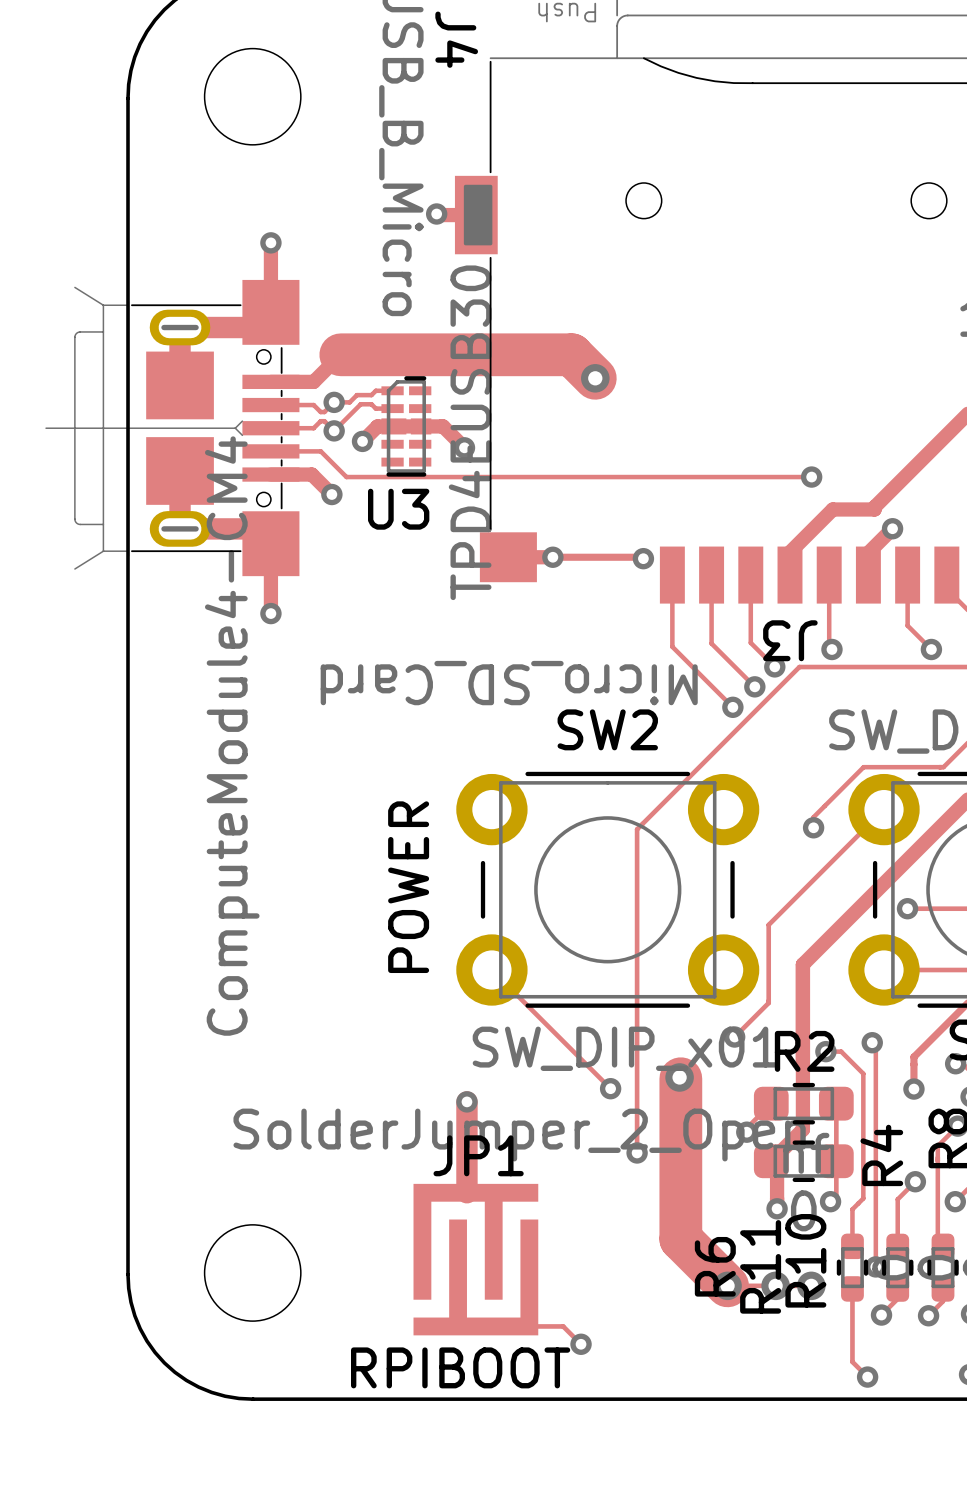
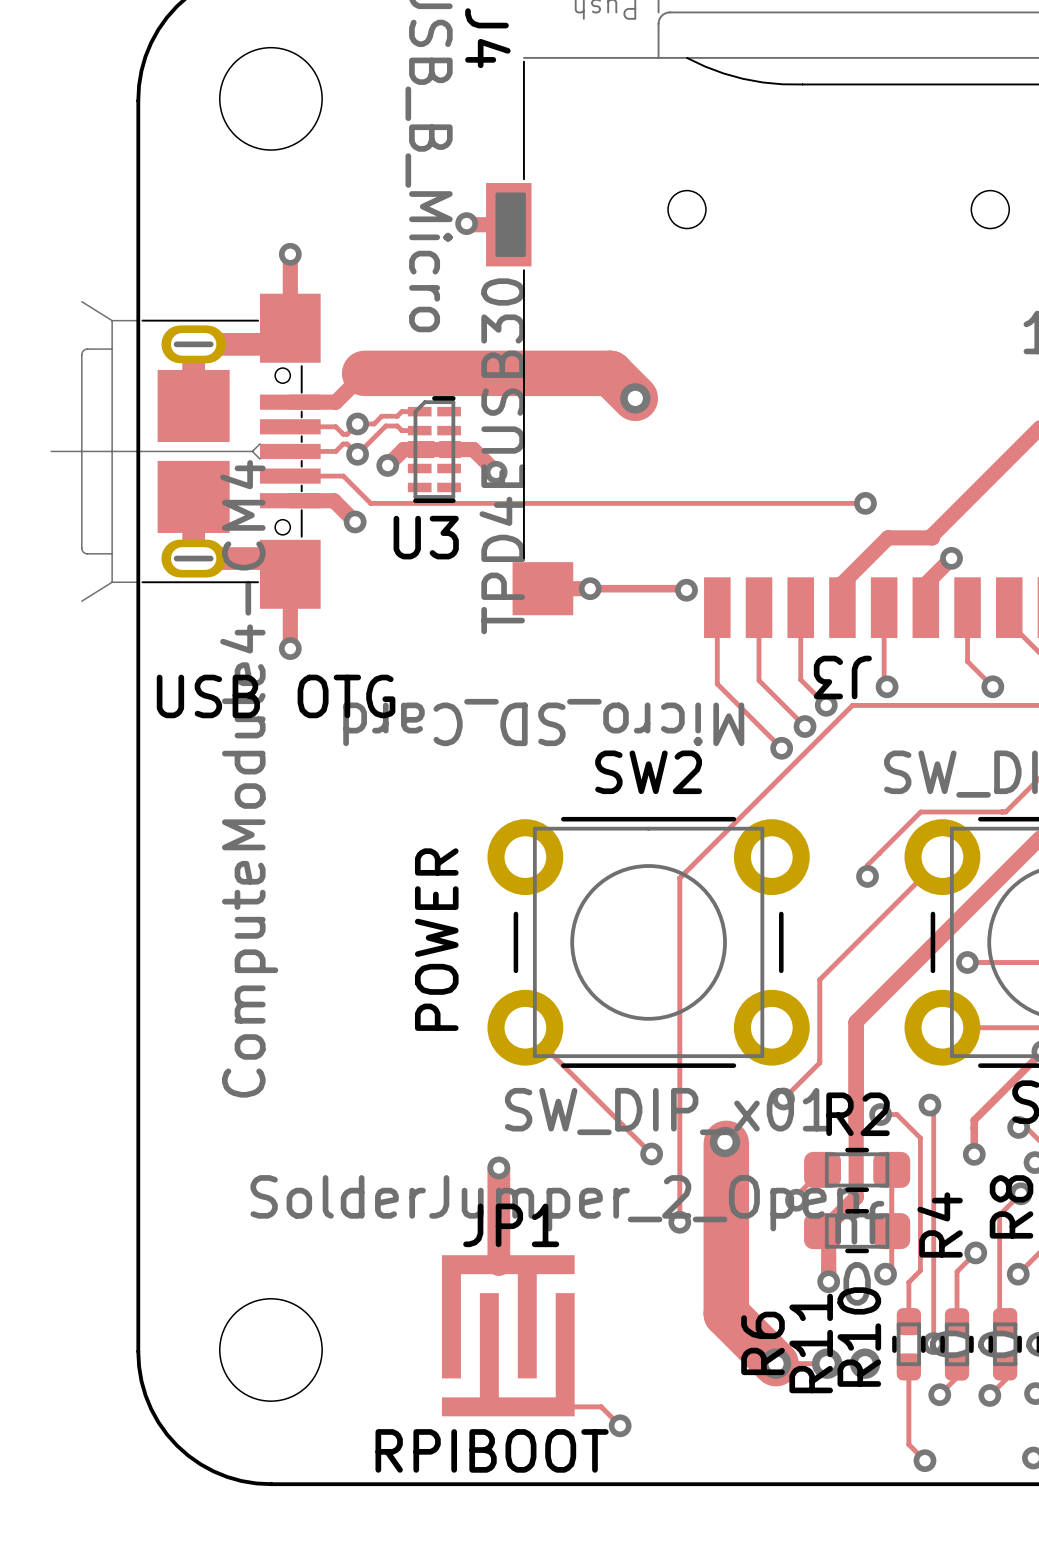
text: none -> USB OTG (276, 696)

